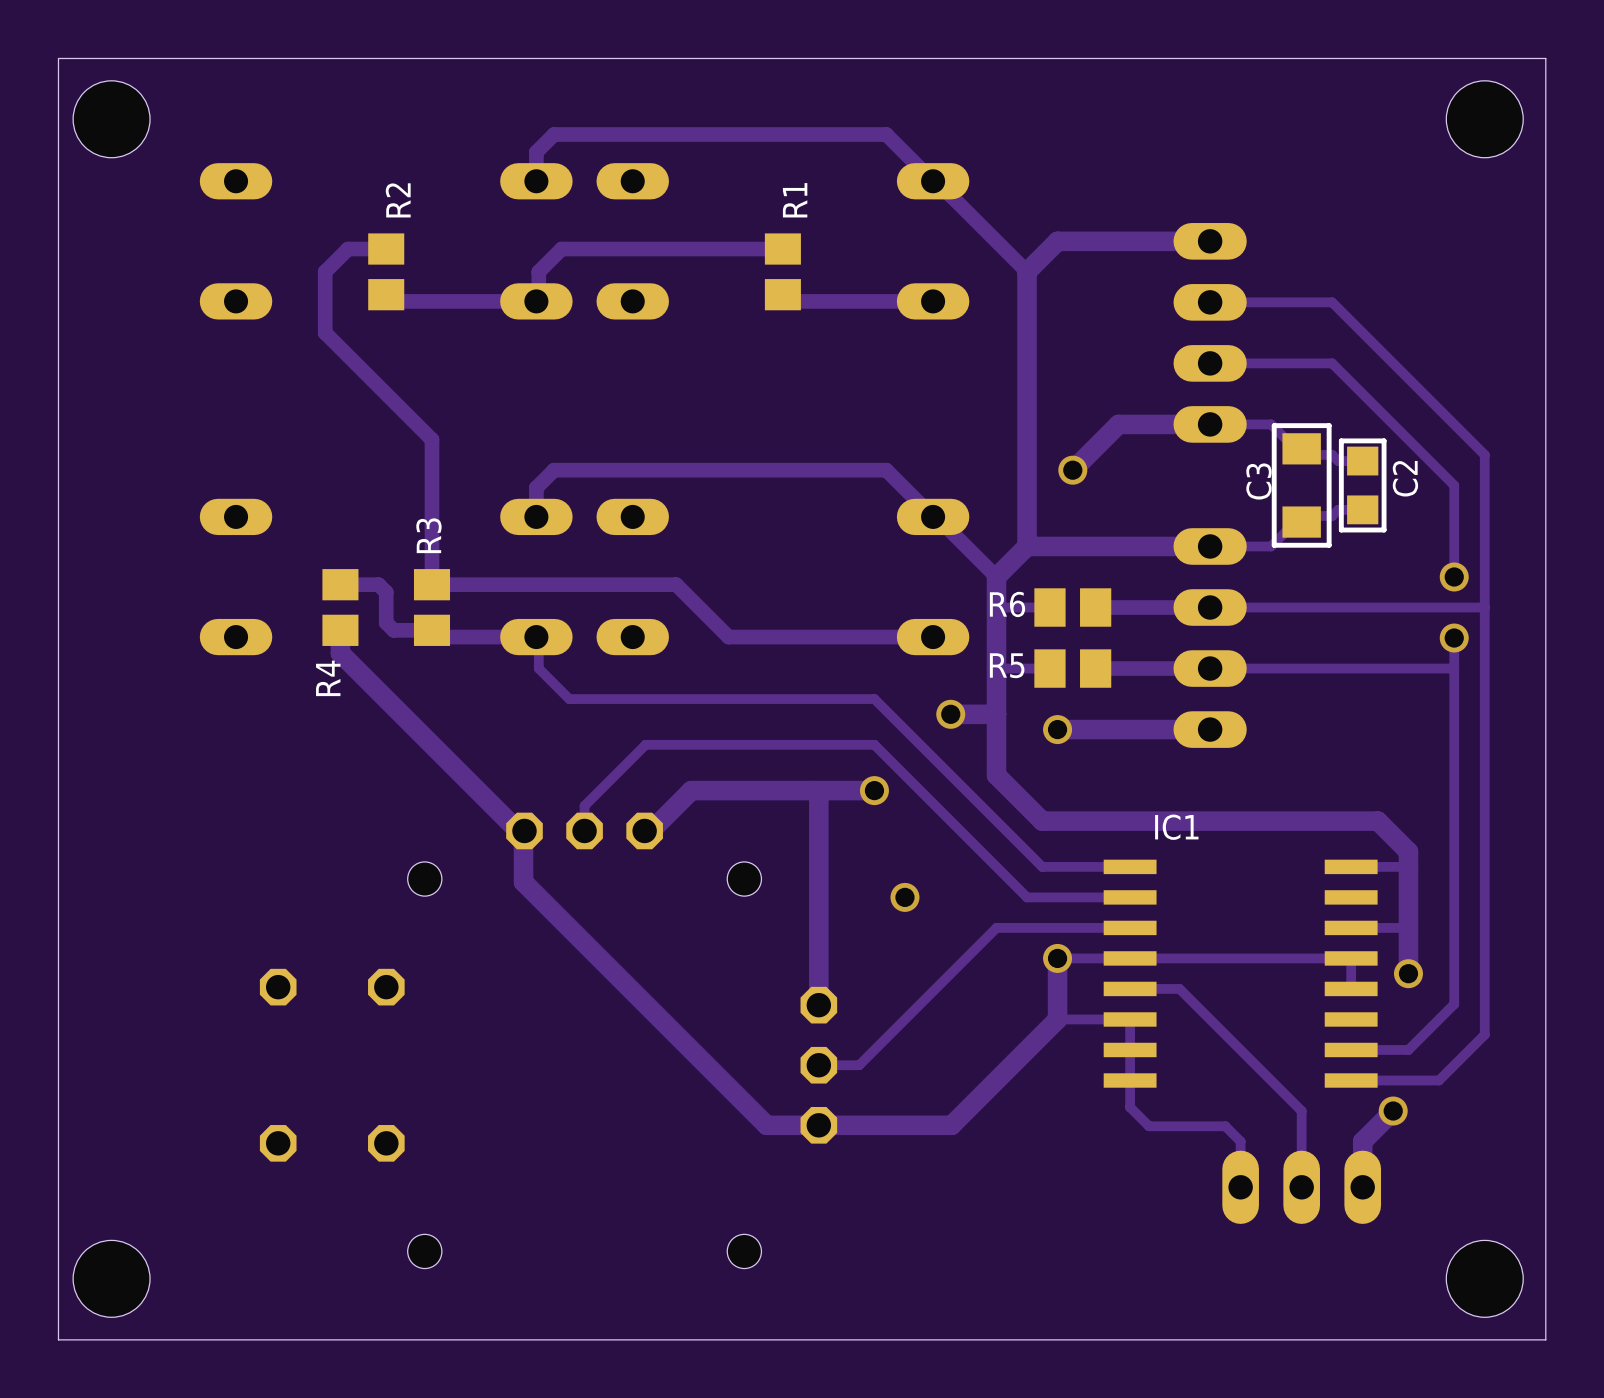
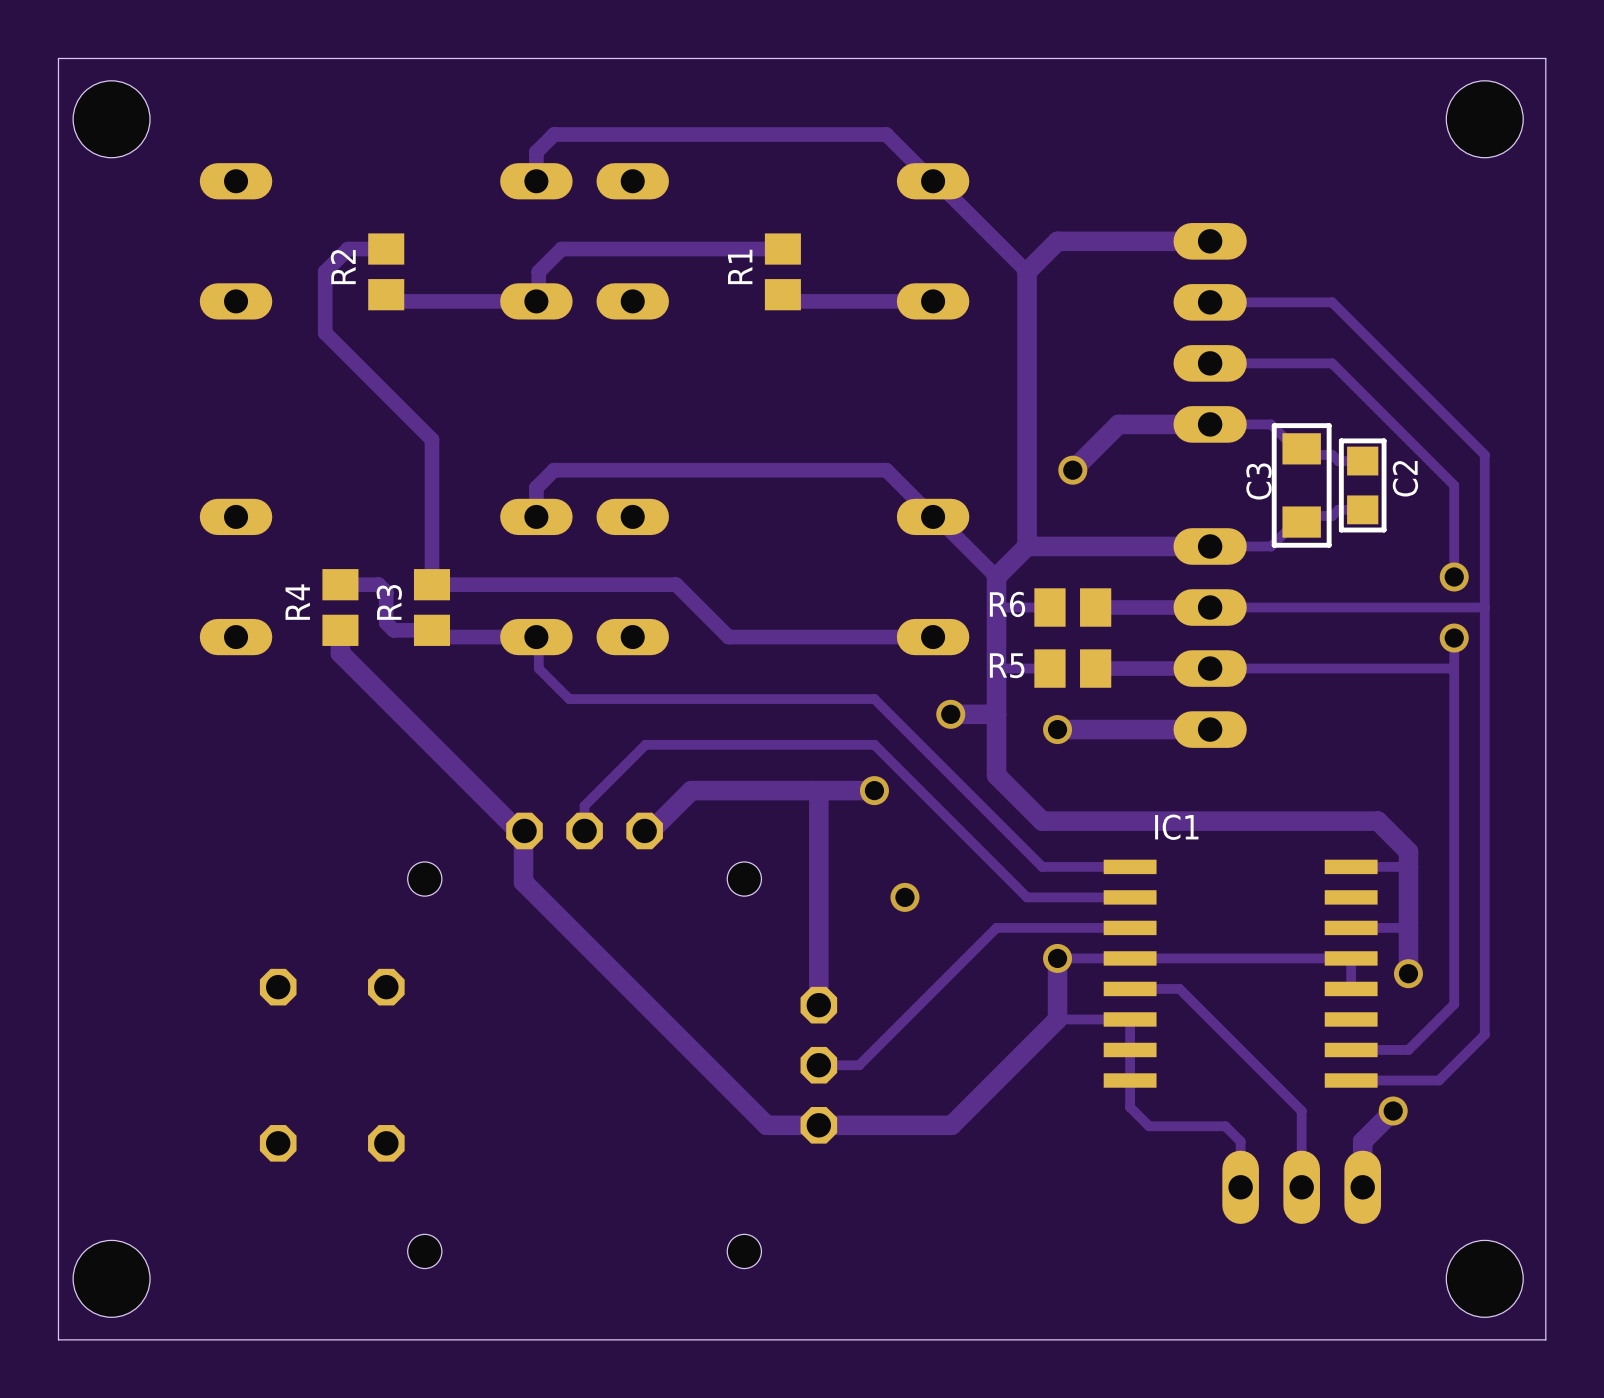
R2 name position: R2 (398, 200) -> R2 (343, 267)
R1 name position: R1 (795, 200) -> R1 (740, 266)
R3 name position: R3 (428, 535) -> R3 (389, 602)
R4 name position: R4 (328, 678) -> R4 (297, 602)

